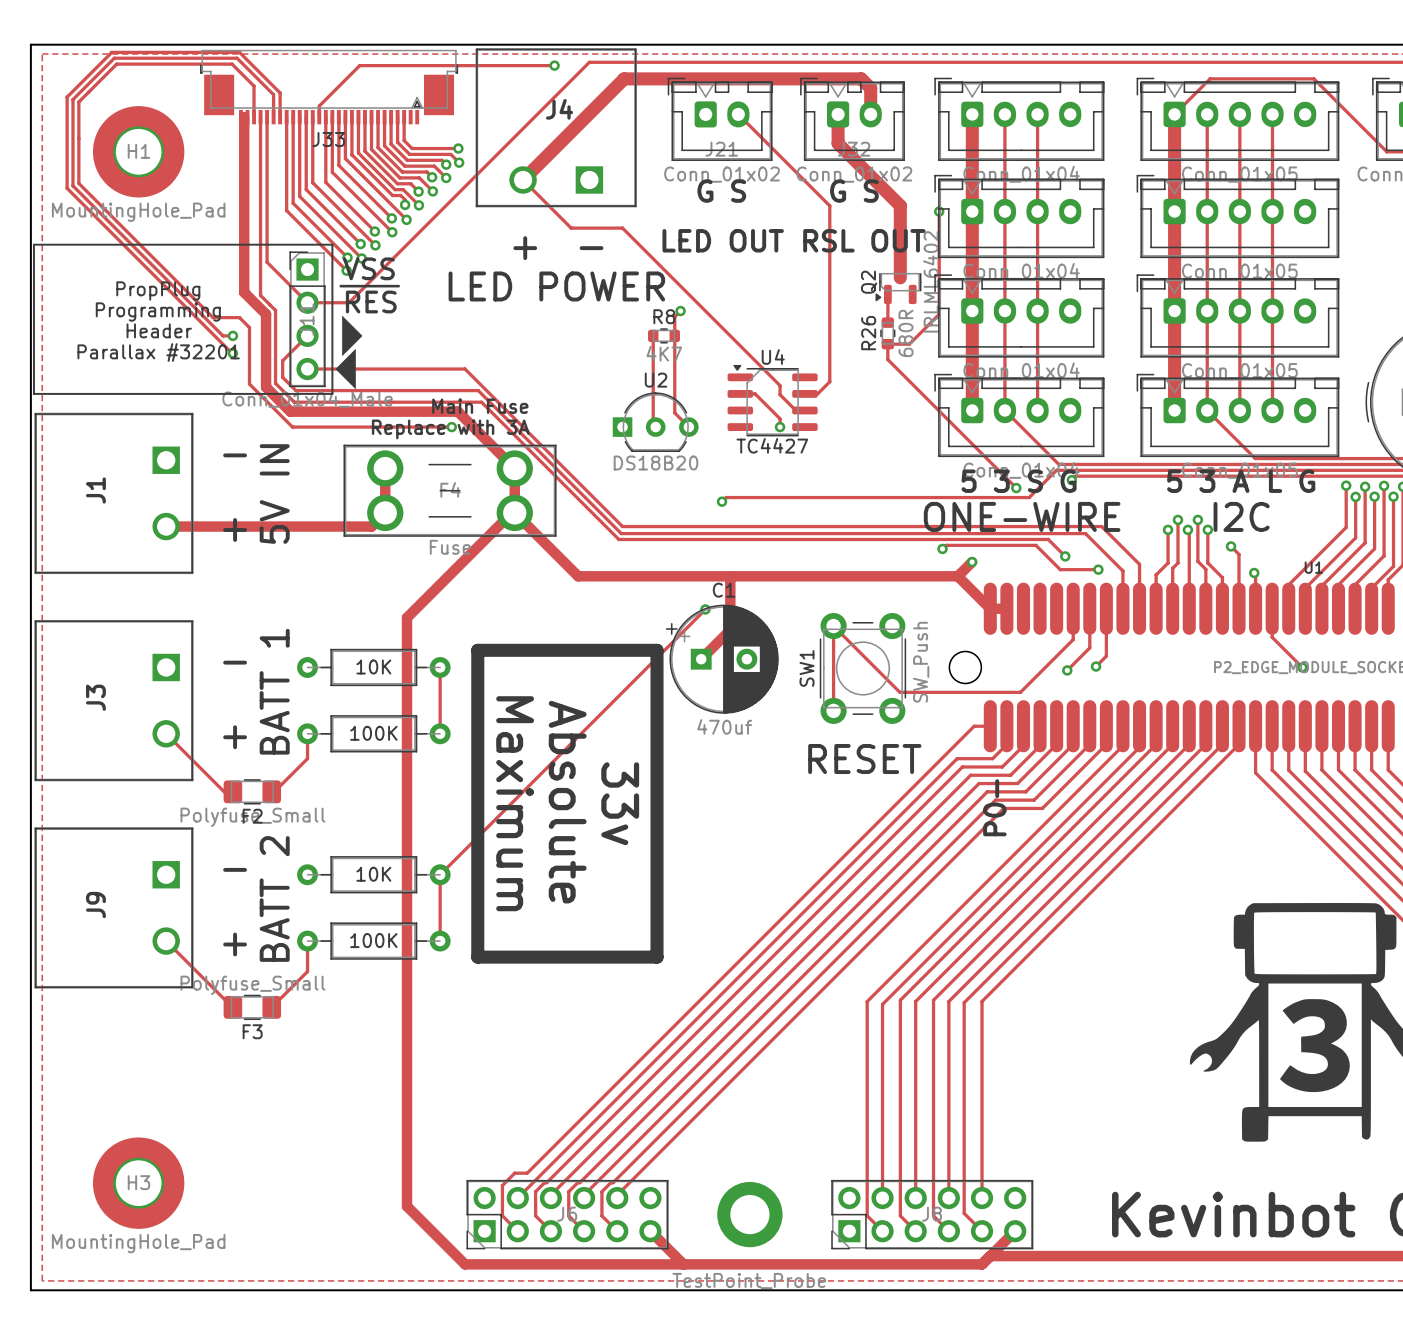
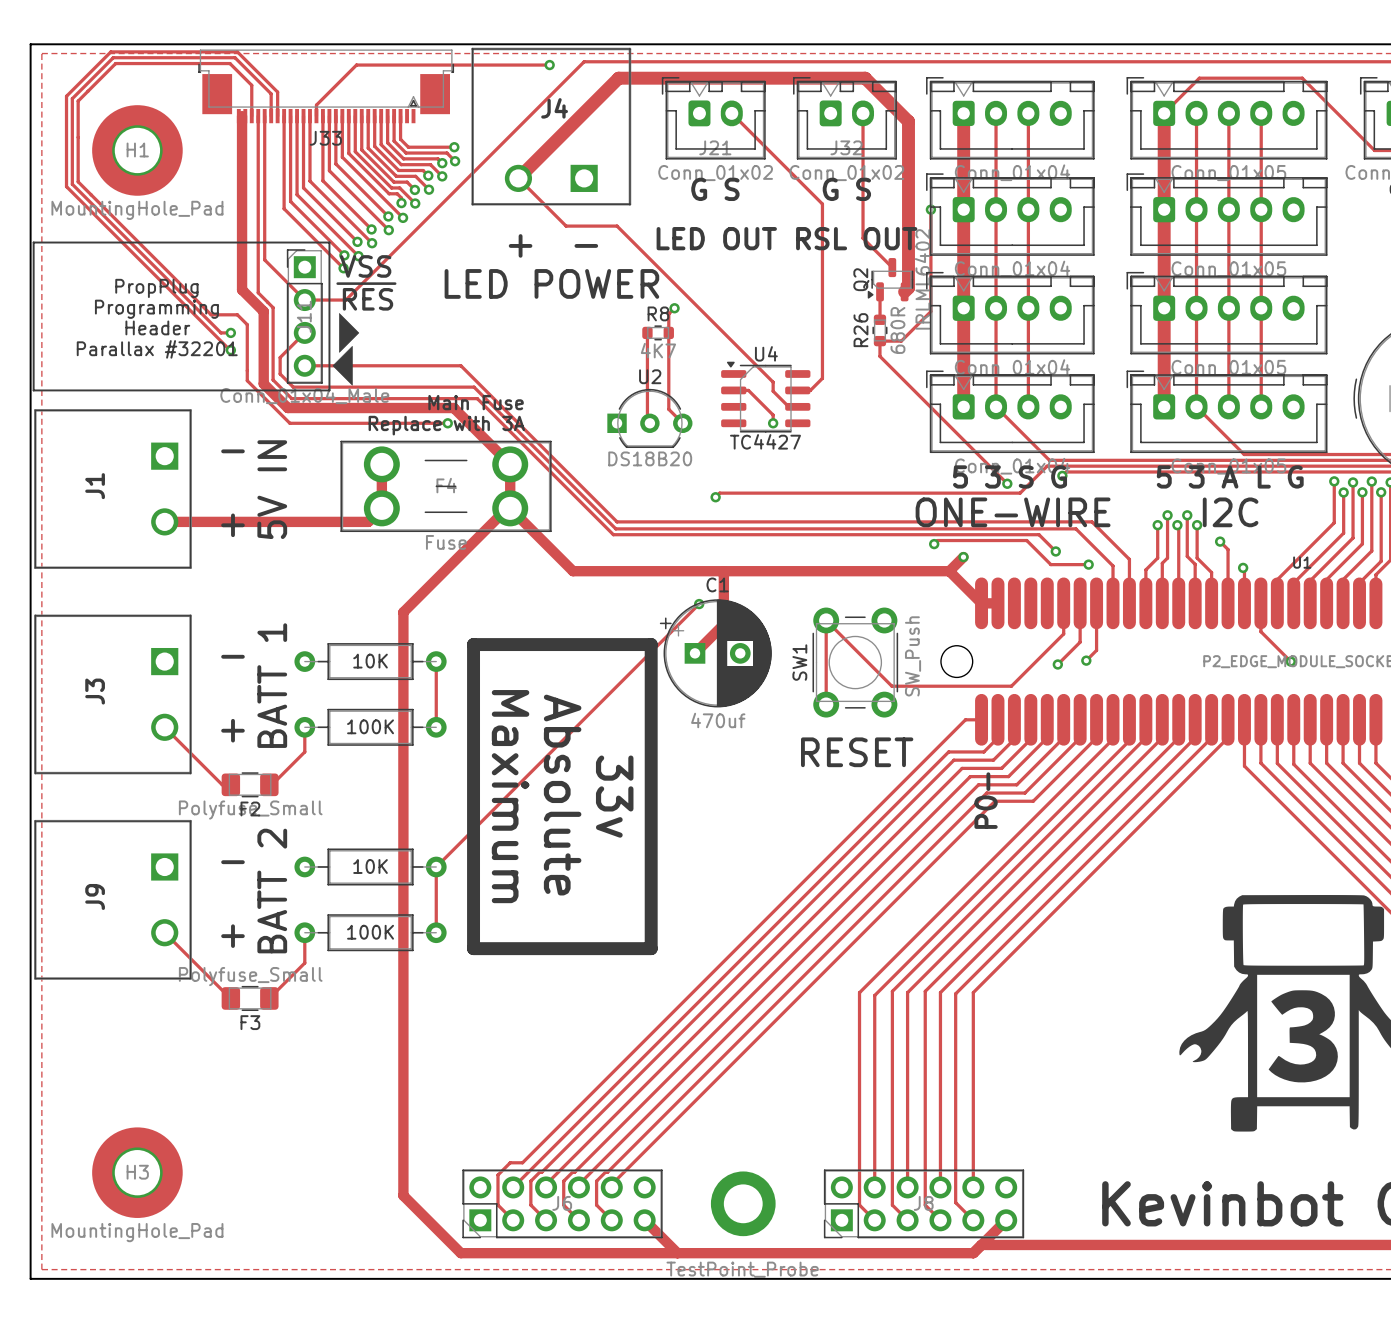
track: (861, 78) (870, 88) (870, 114) -> (853, 78) (865, 78) (908, 121) (908, 287) (904, 291)
track: (838, 114) (838, 143) (900, 205) (900, 277) -> none
track: none -> (863, 113) (863, 238) (892, 267)

